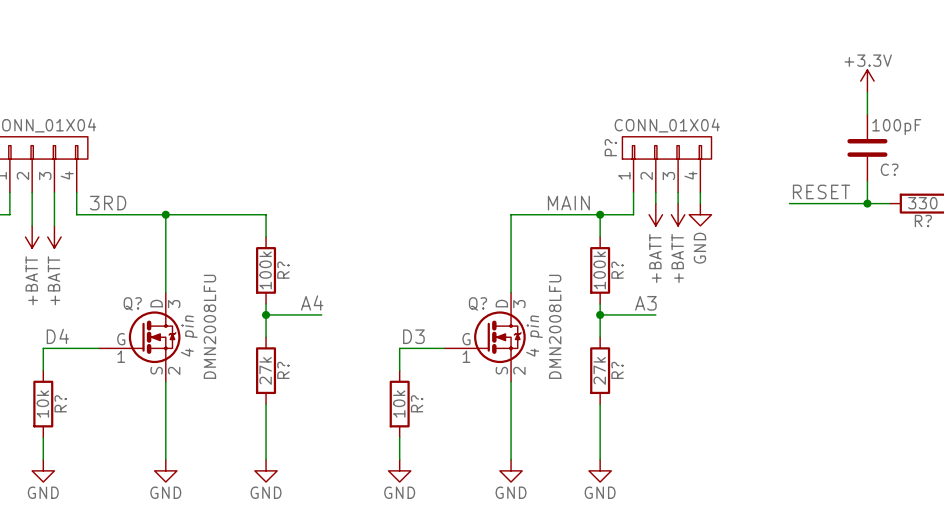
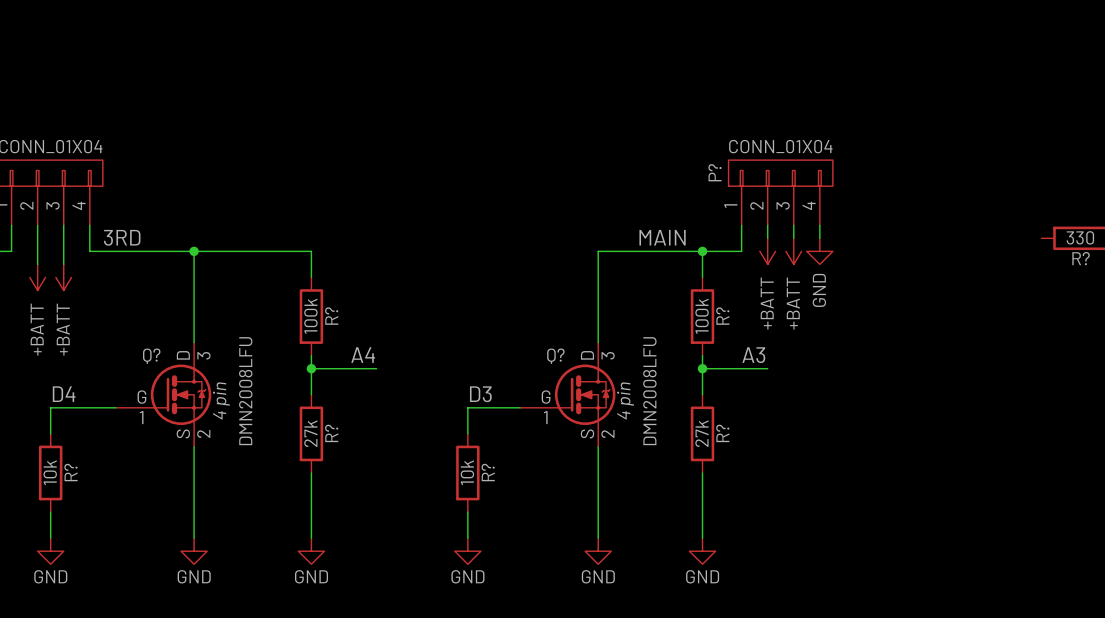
power symbol: +3.3V (867, 81) -> none
wire: (867, 92) (867, 114) -> none
C?: 100pF (867, 147) -> none
wire: (867, 181) (867, 203) -> none
label: RESET (821, 191) -> none
wire: (789, 203) (889, 203) -> none
junction: (867, 203) -> none

